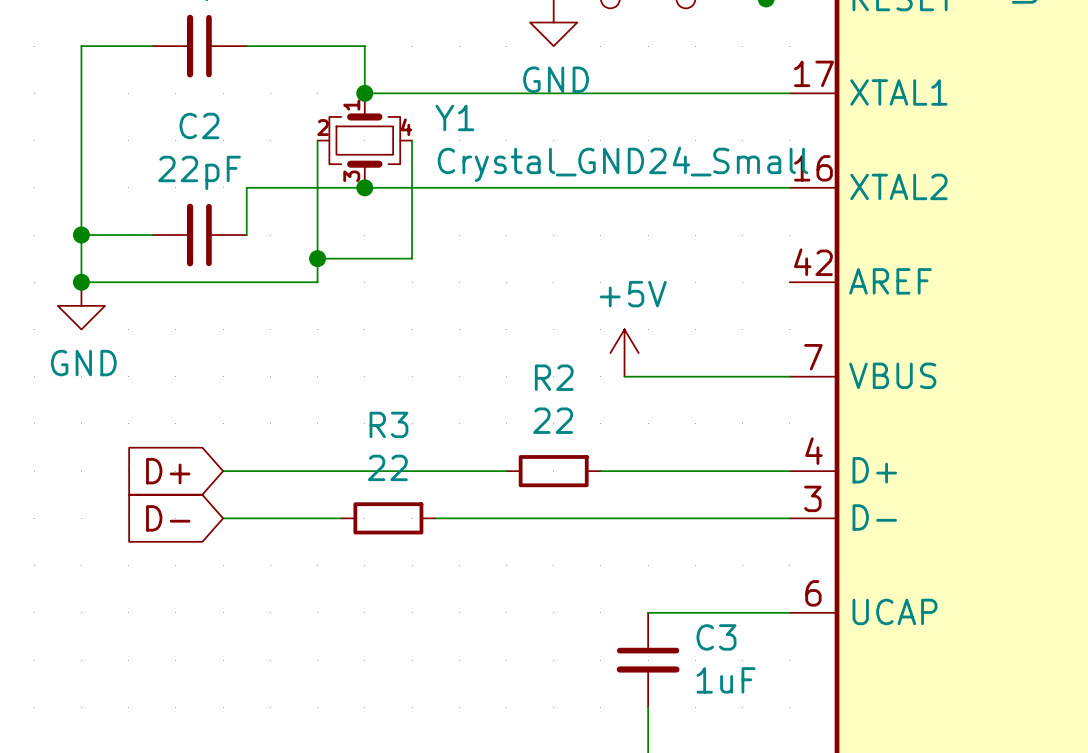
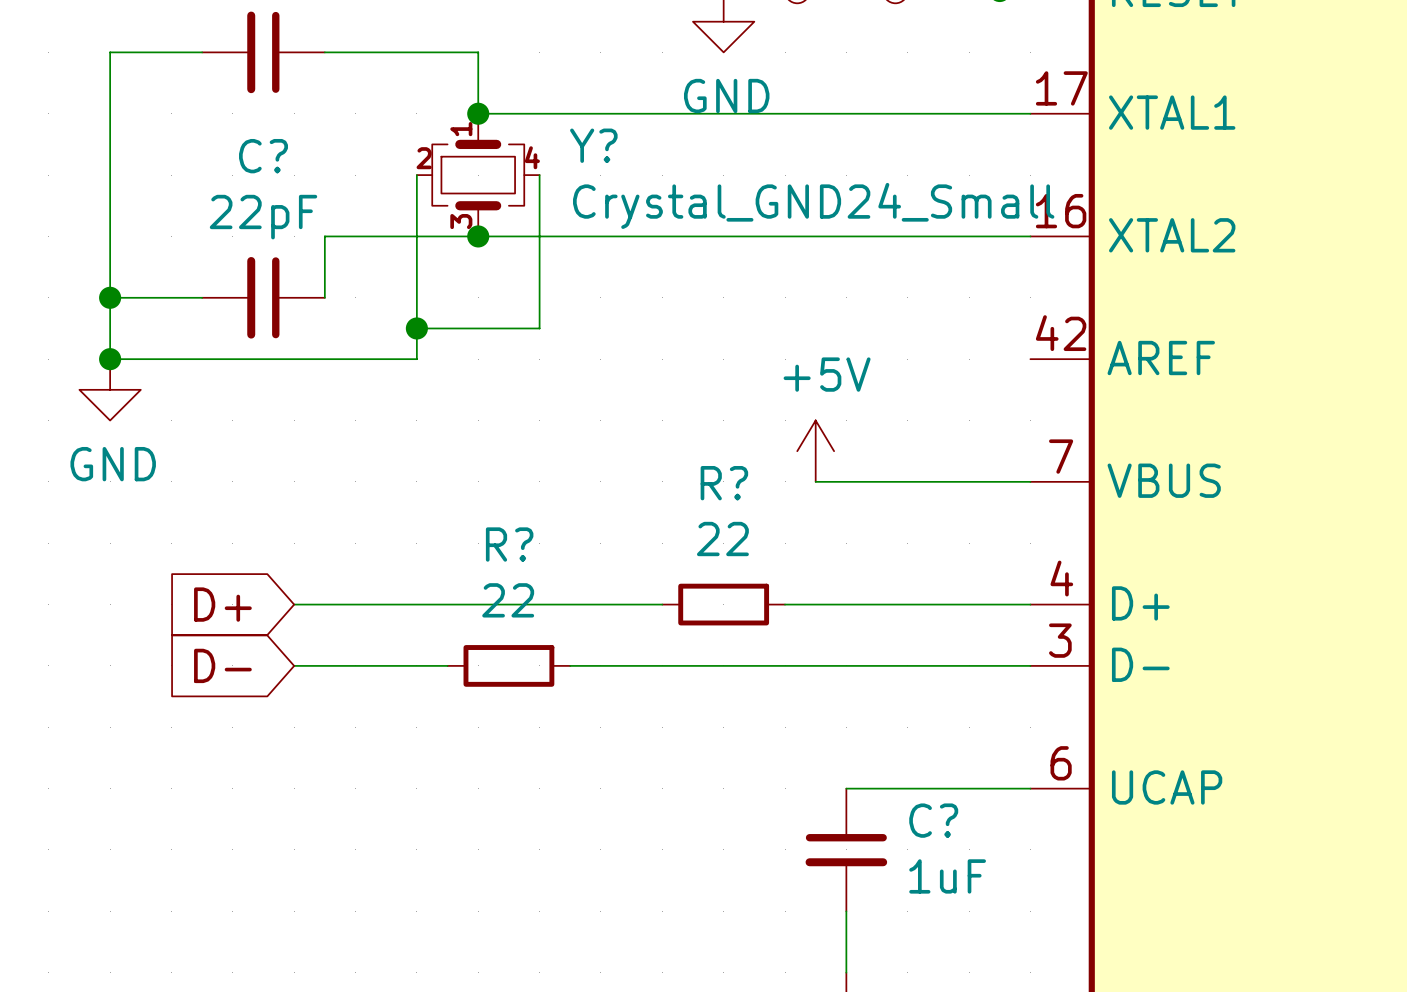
Y1 name: Y1 (454, 117) -> Y? (593, 145)
C2 name: C2 (199, 126) -> C? (263, 156)
R2 name: R2 (554, 377) -> R? (724, 483)
R3 name: R3 (388, 424) -> R? (509, 544)
C3 name: C3 (716, 637) -> C? (933, 820)

